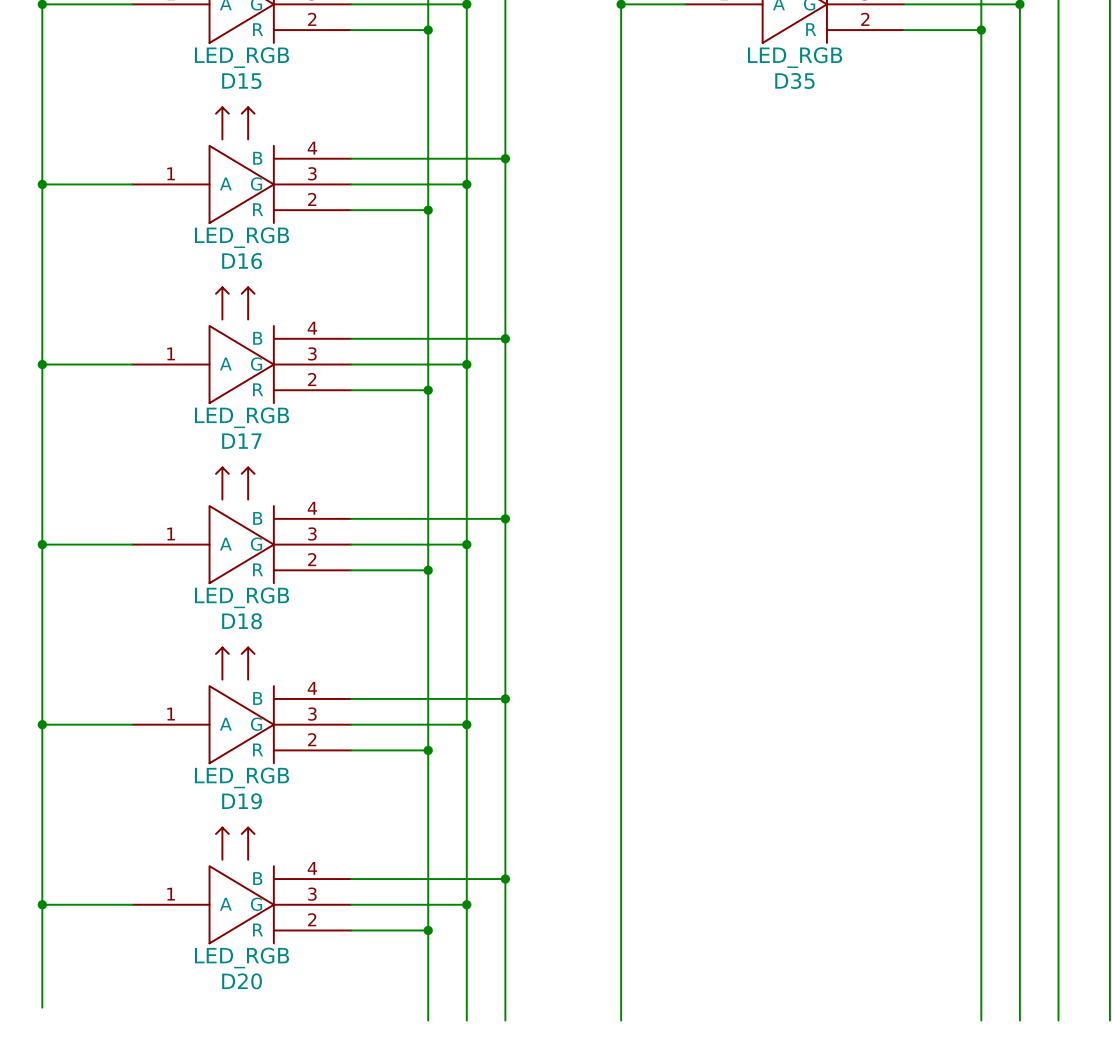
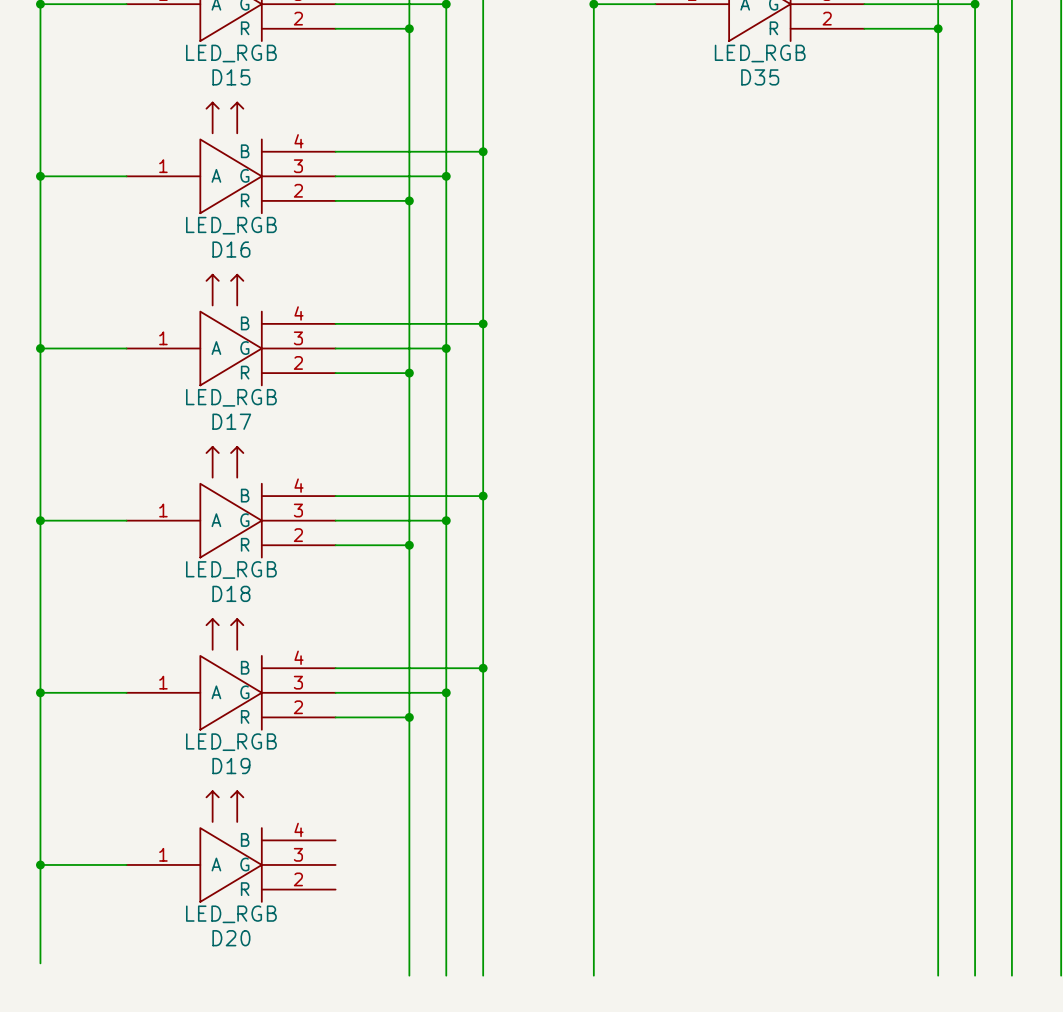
wire: (351, 879) (505, 879) -> none
junction: (505, 879) -> none
wire: (351, 904) (466, 904) -> none
junction: (466, 904) -> none
wire: (351, 930) (428, 930) -> none
junction: (428, 930) -> none

